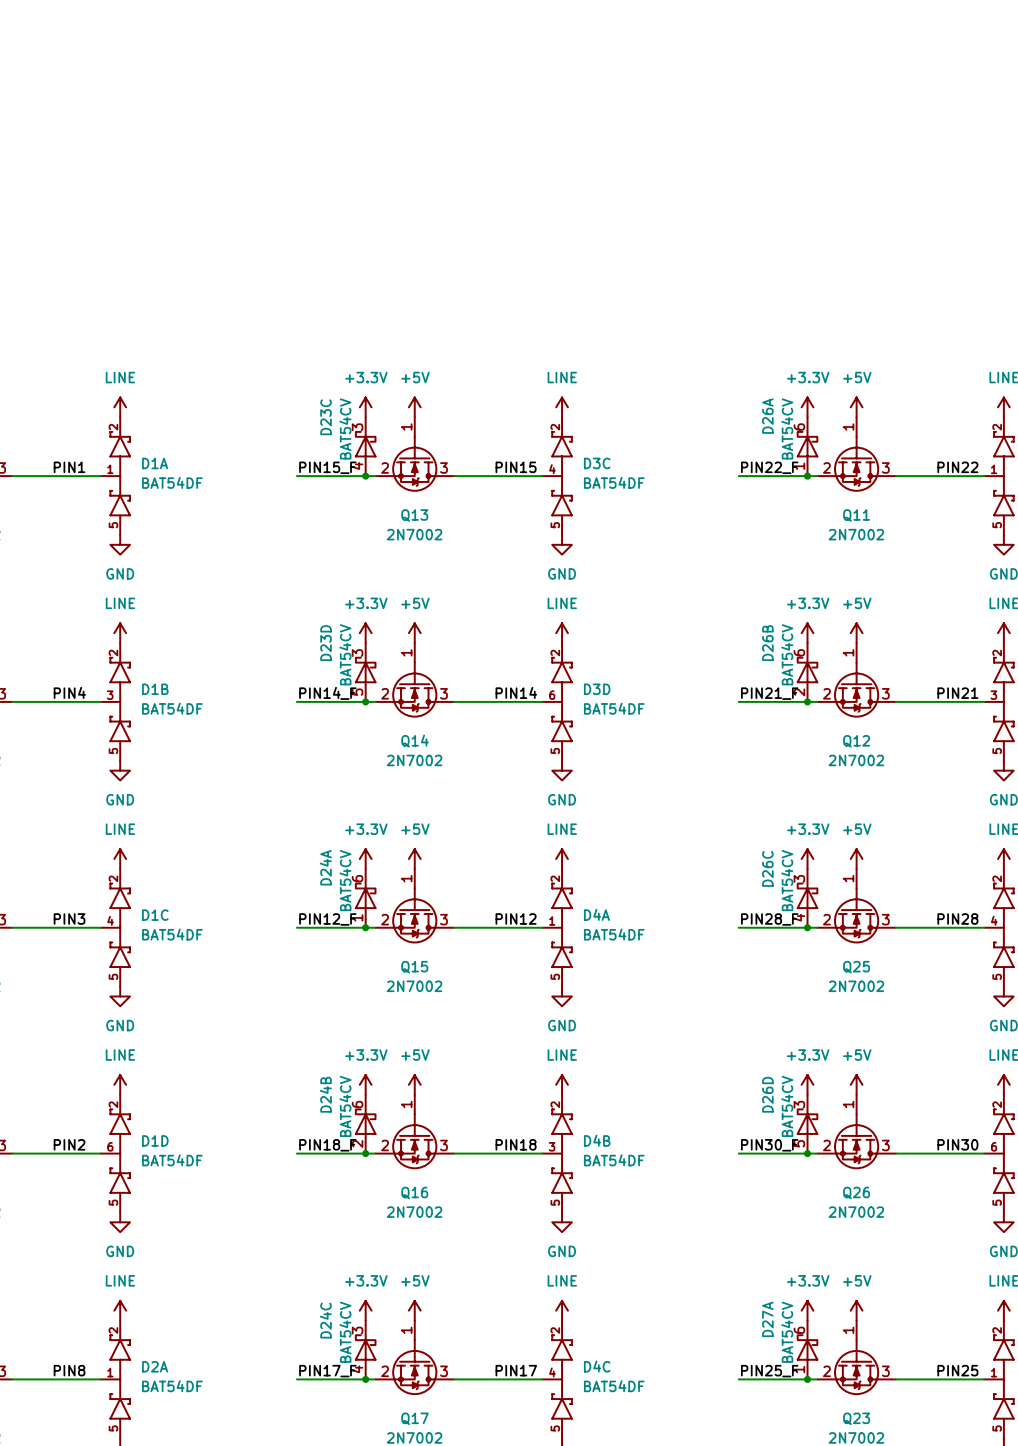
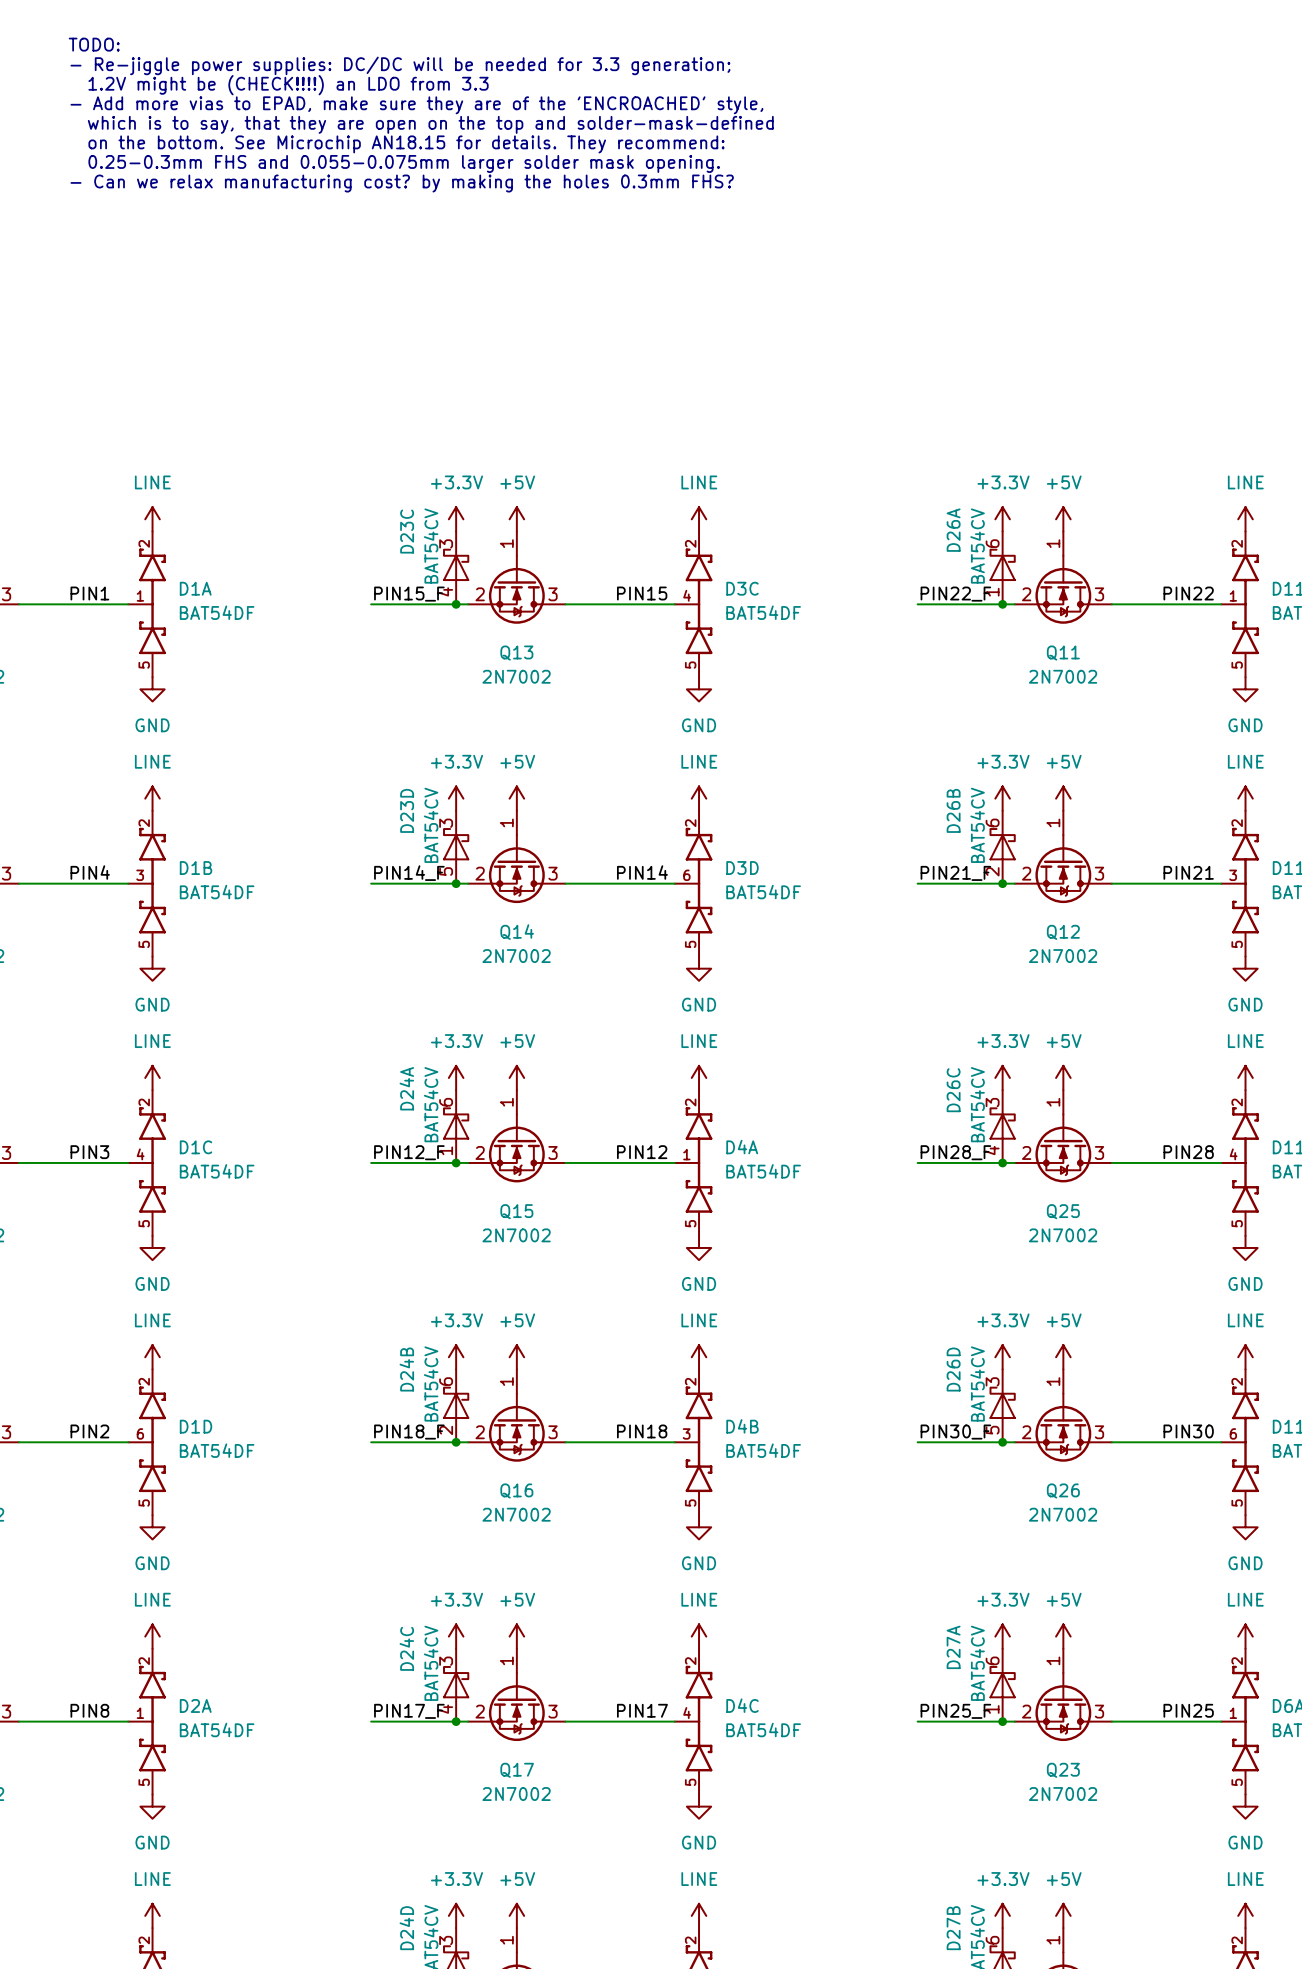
text: none -> TODO: (94, 44)
text: none -> - Re-jiggle power supplies: DC/DC will be needed for 3.3 generation; (400, 65)
text: none -> 1.2V might be (CHECK!!!!) an LDO from 3.3 (288, 85)
text: none -> - Add more vias to EPAD, make sure they are of the 'ENCROACHED' style, (416, 105)
text: none -> which is to say, that they are open on the top and solder-mask-defined (430, 124)
text: none -> on the bottom. See Microchip AN18.15 for details. They recommend: (406, 144)
text: none -> 0.25-0.3mm FHS and 0.055-0.075mm larger solder mask opening. (404, 163)
text: none -> - Can we relax manufacturing cost? by making the holes 0.3mm FHS? (402, 183)

